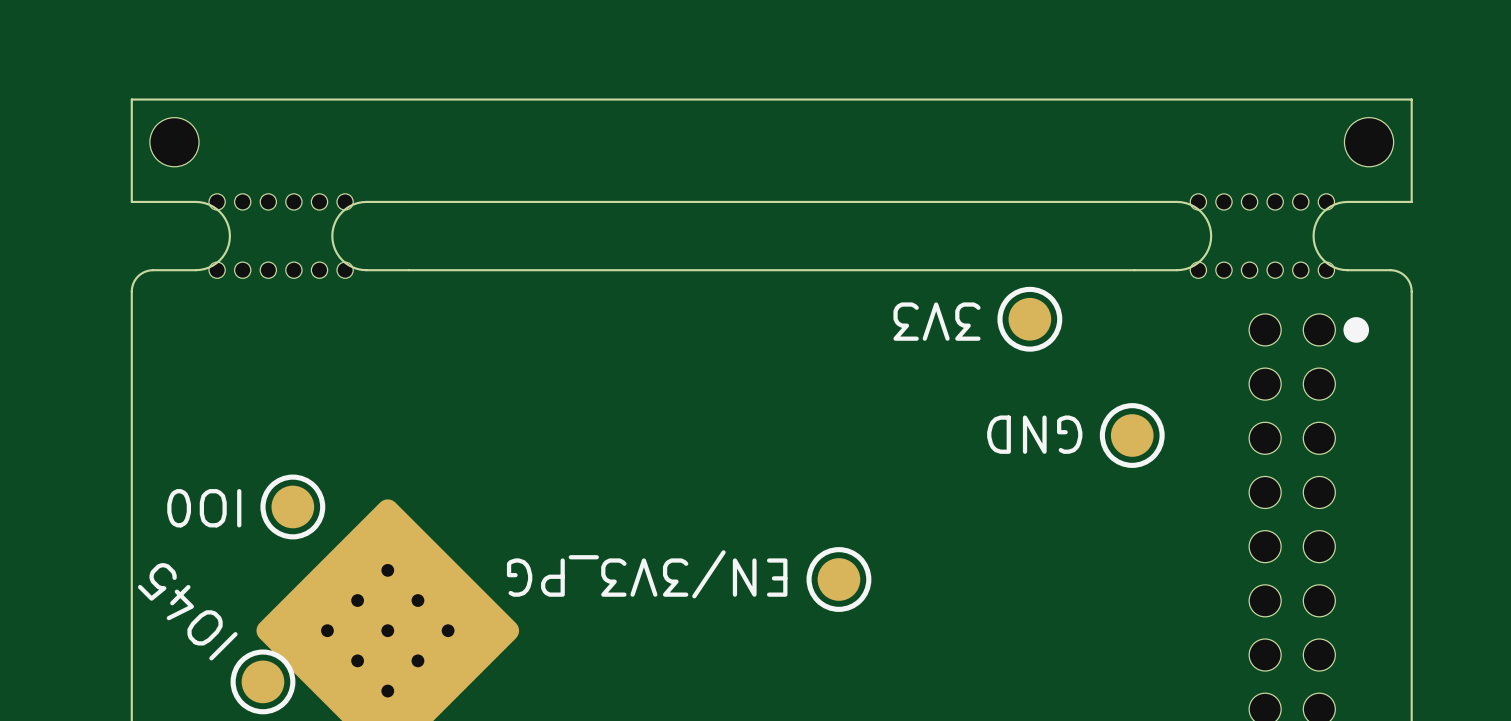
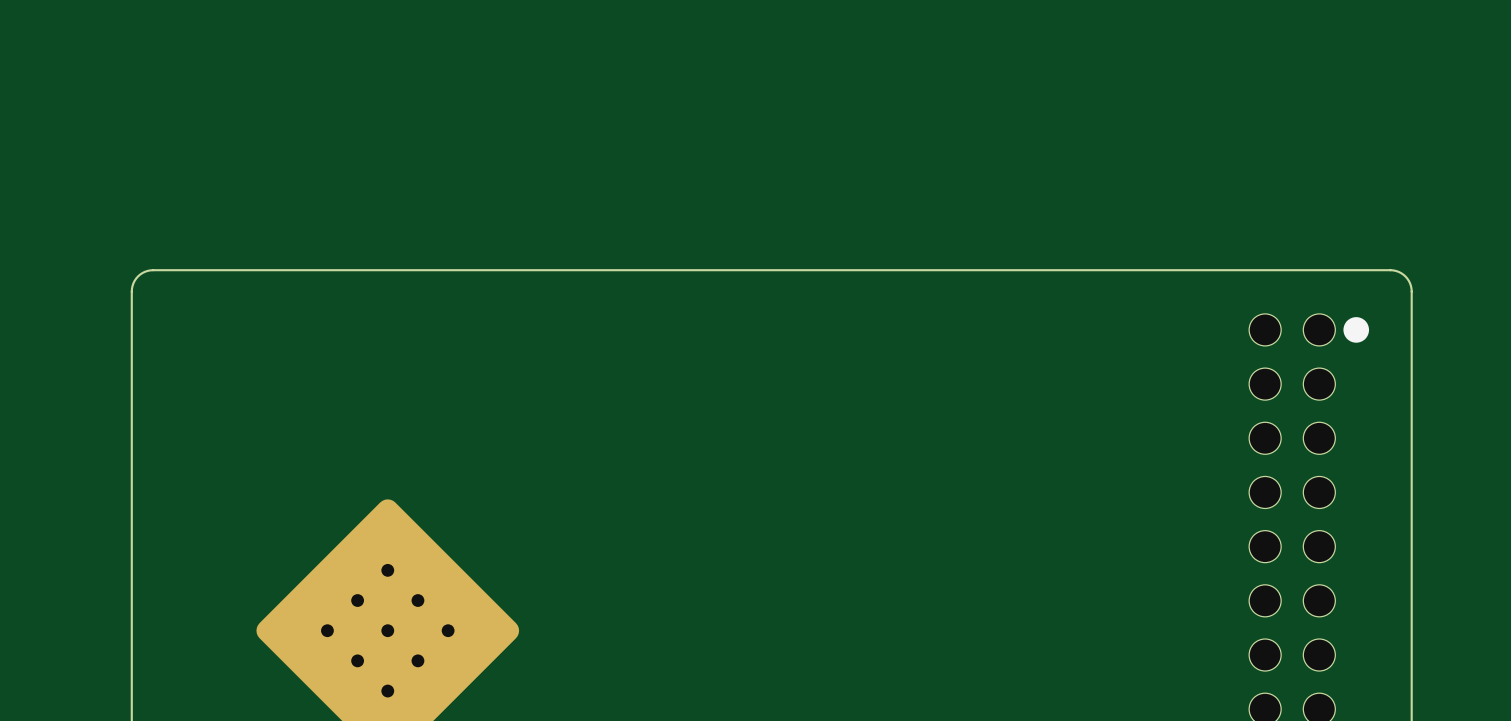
part: (174, 142) -> none
part: (1369, 142) -> none
board edge: (1134, 201) (409, 201) -> none
board edge: (1390, 201) (1411, 201) (1411, 99) (131, 99) (131, 201) (153, 201) -> none
part: (281, 236) -> none
part: (1262, 236) -> none
board edge: none -> (409, 270) (153, 270)
board edge: none -> (1390, 270) (1134, 270)
part: (1029, 319) -> none
text: 3V3 (937, 321) -> none
text: GND (1034, 434) -> none
part: (1132, 435) -> none
part: (292, 506) -> none
text: IO0 (204, 508) -> none
text: EN/3V3_PG (647, 574) -> none
part: (838, 579) -> none
text: IO45 (187, 611) -> none
part: (262, 681) -> none

